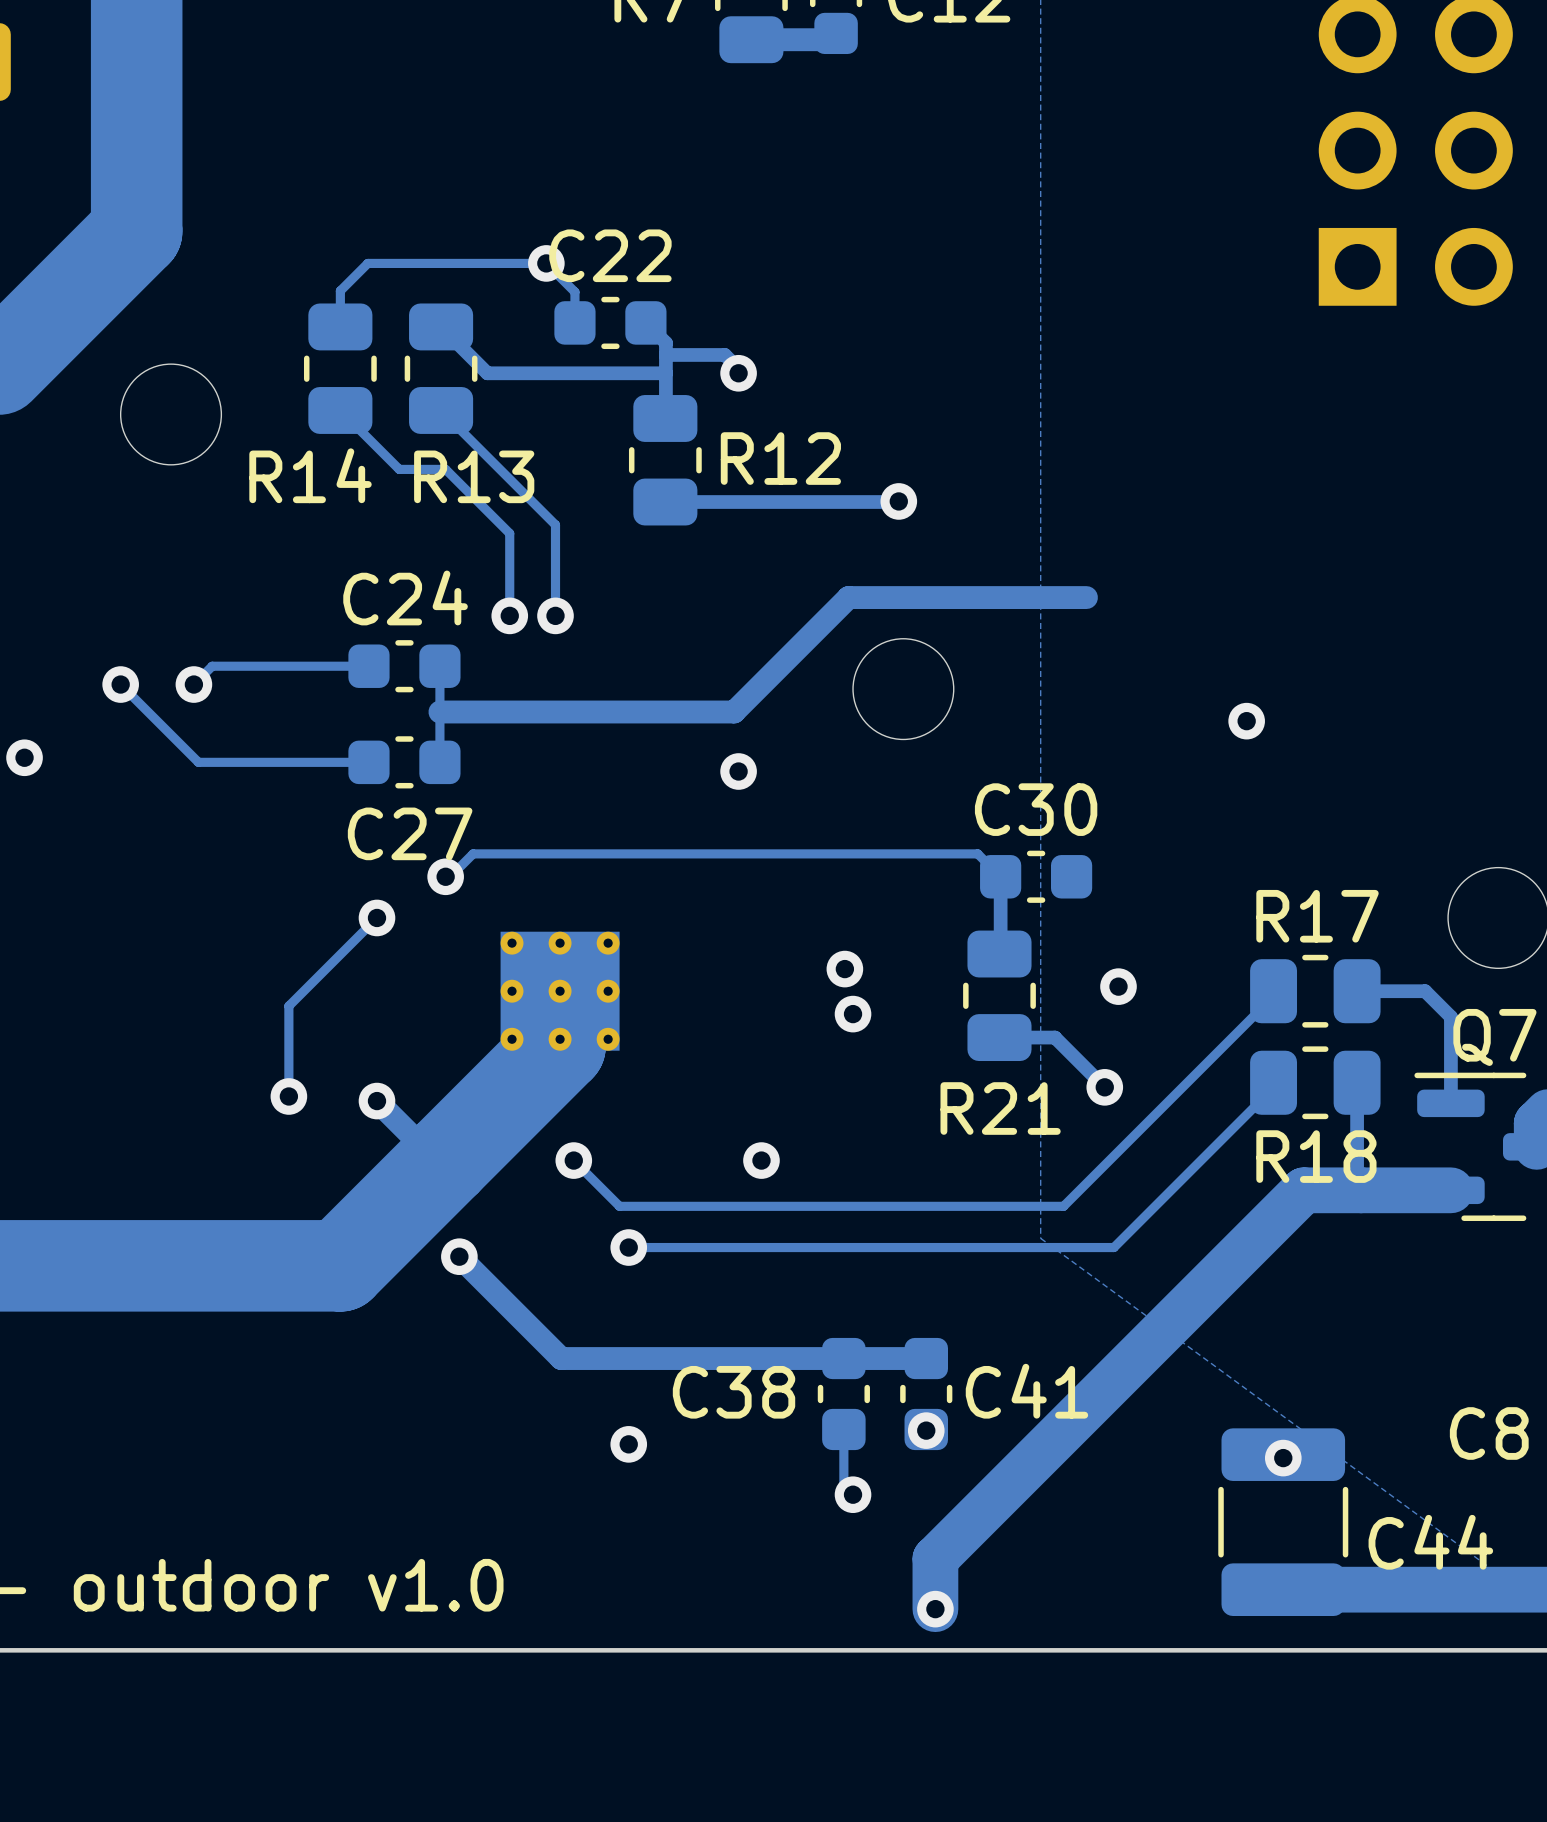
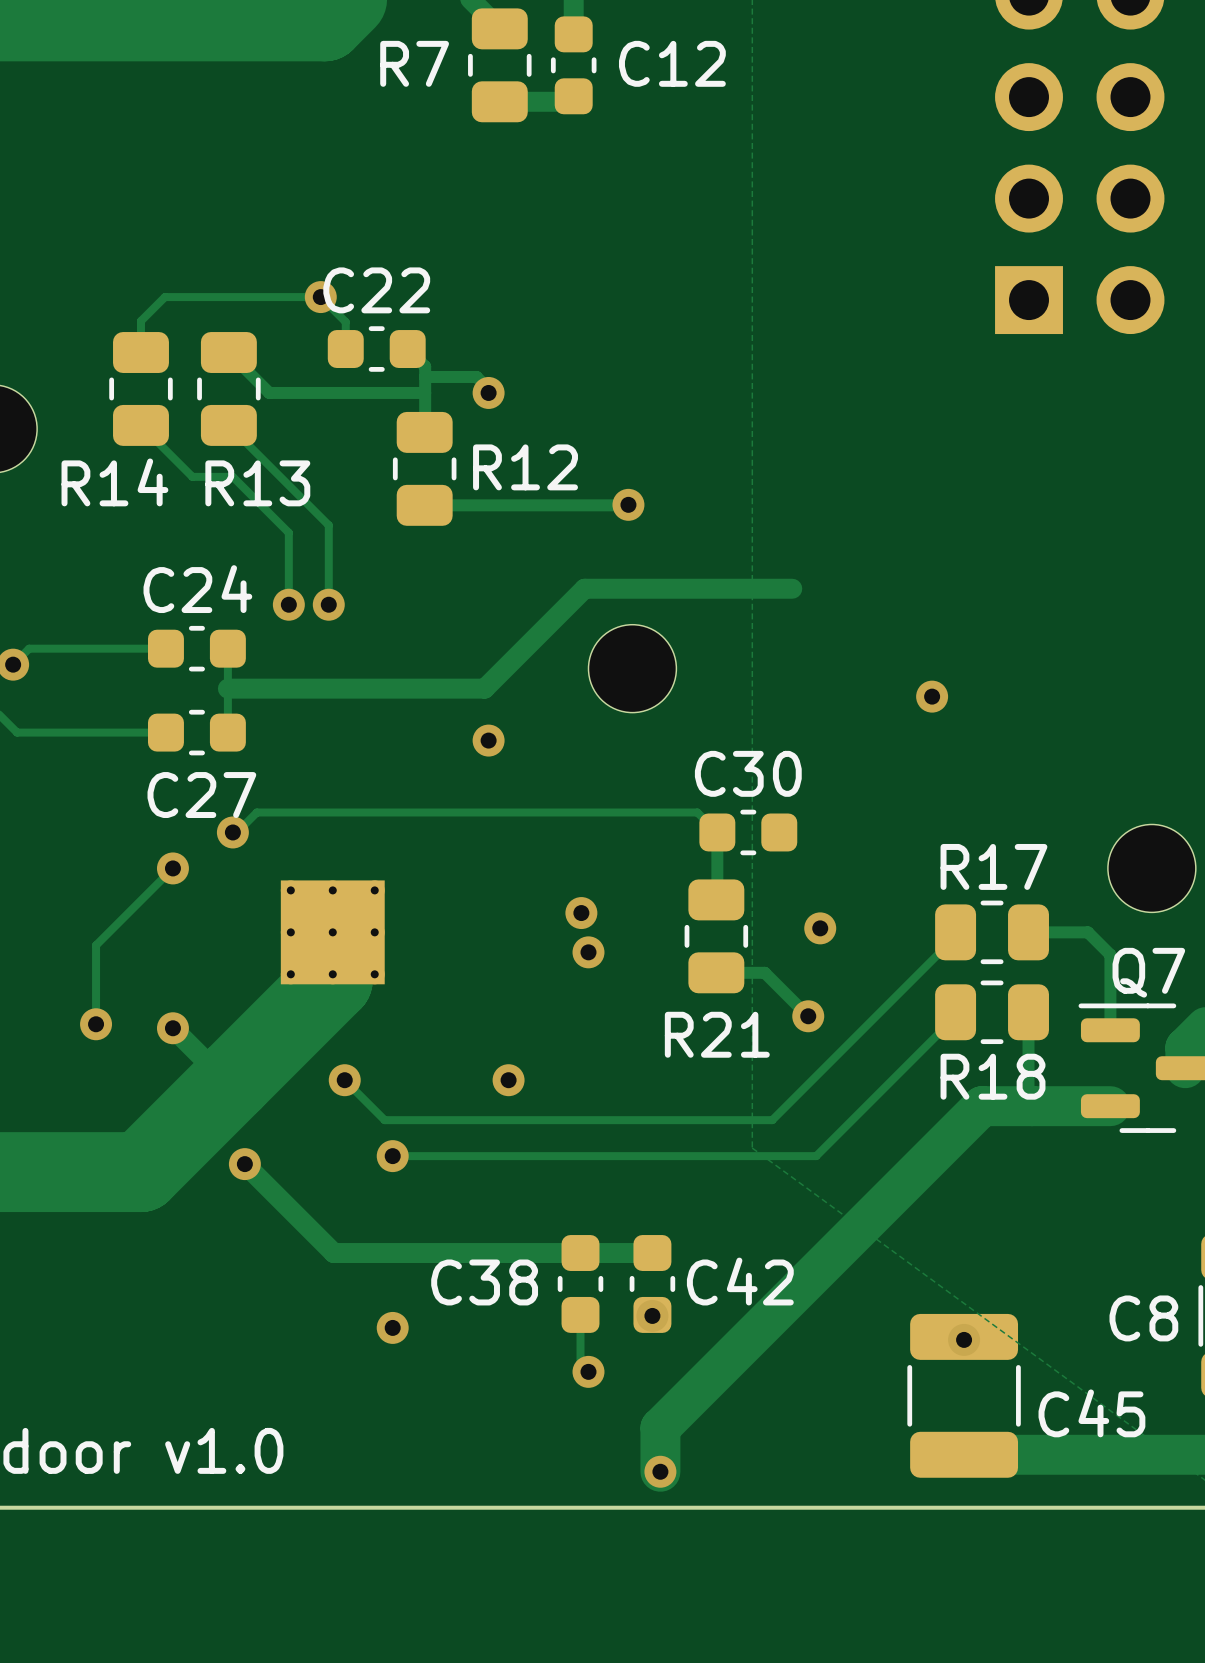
C41 name: C41 (1026, 1391) -> C42 (740, 1281)
C44 name: C44 (1430, 1542) -> C45 (1091, 1413)

